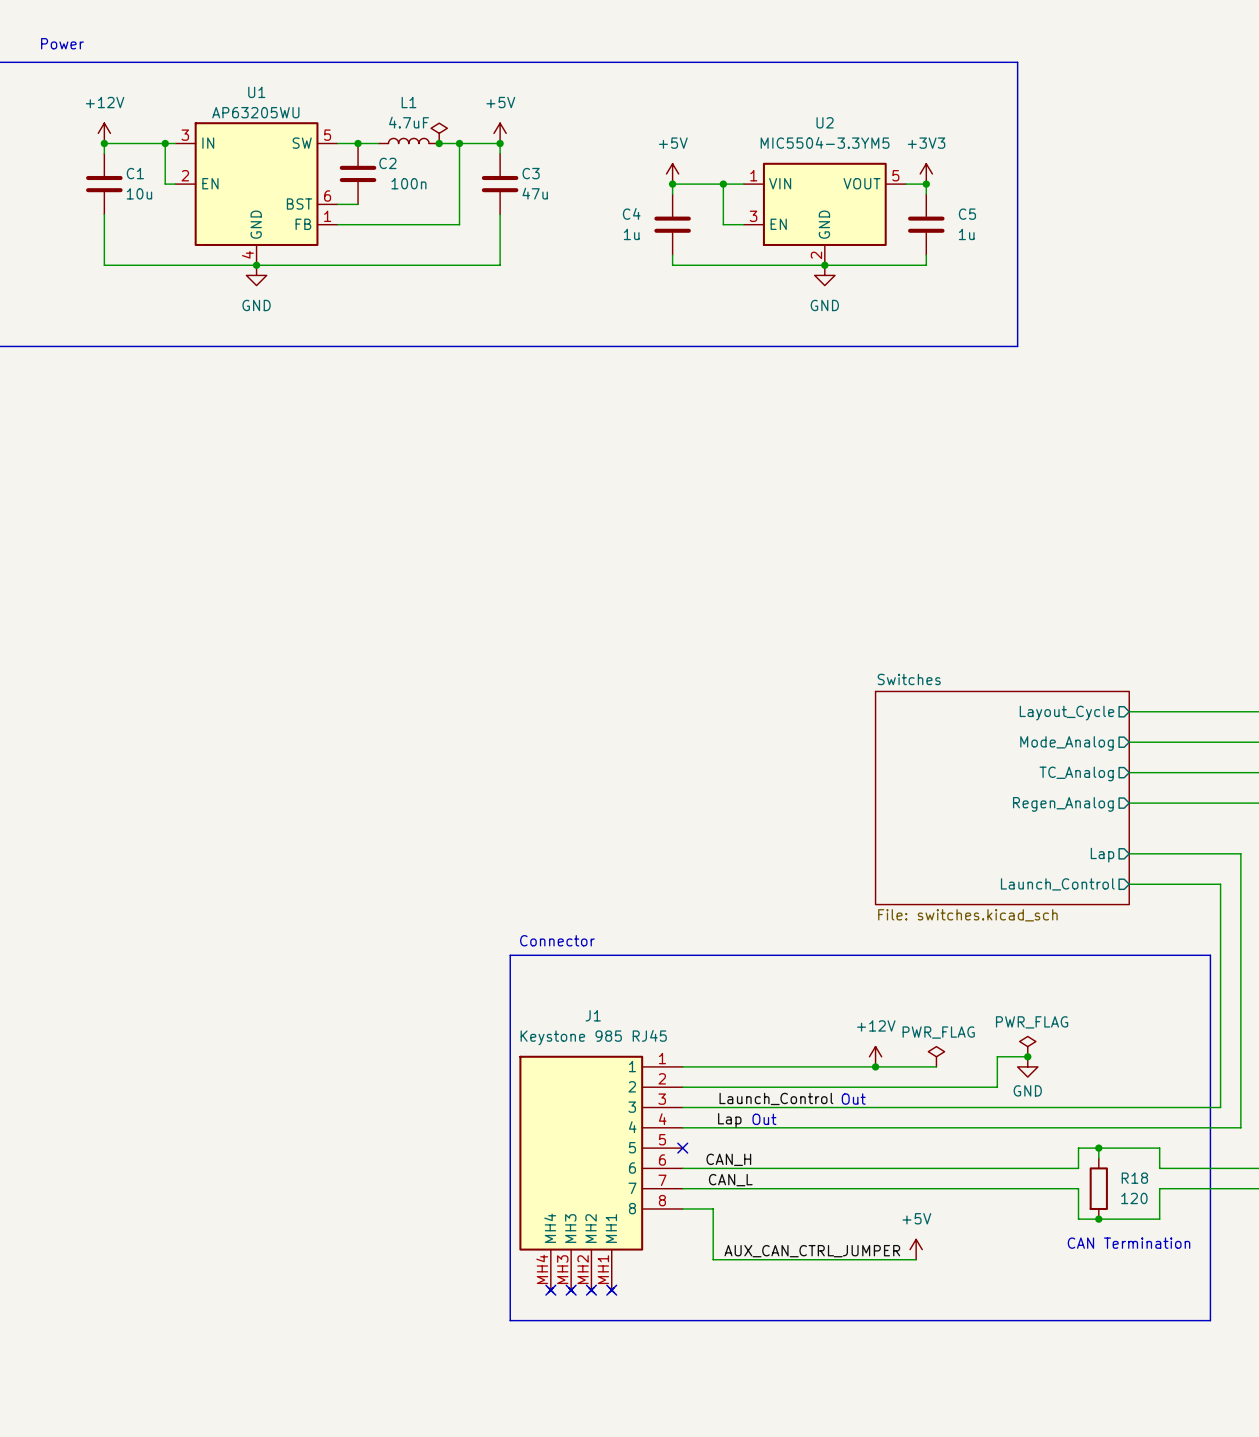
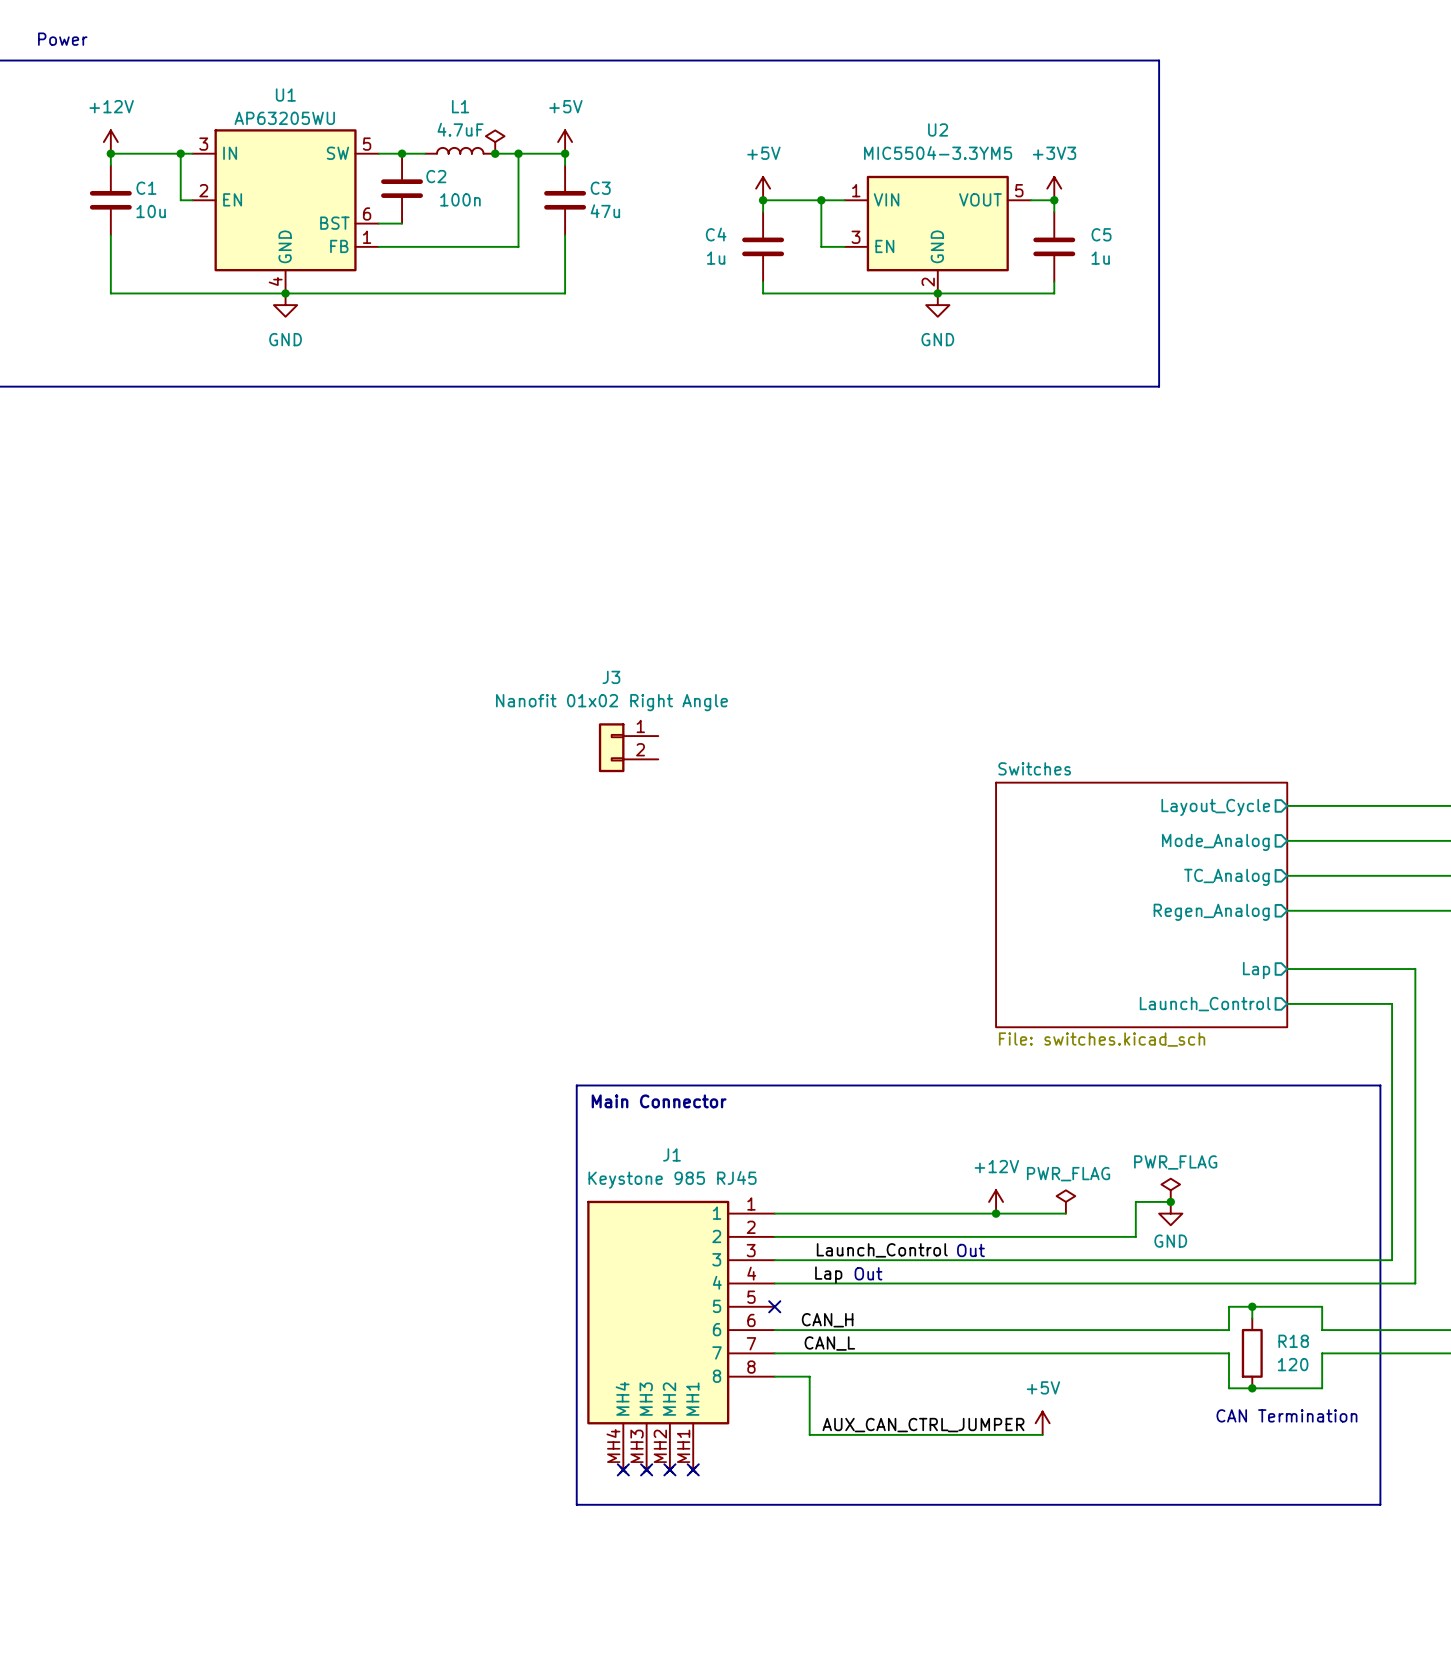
J3: none -> Nanofit 01x02 Right Angle (628, 747)
text: Connector (557, 940) -> none
text: none -> Main Connector (659, 1101)

